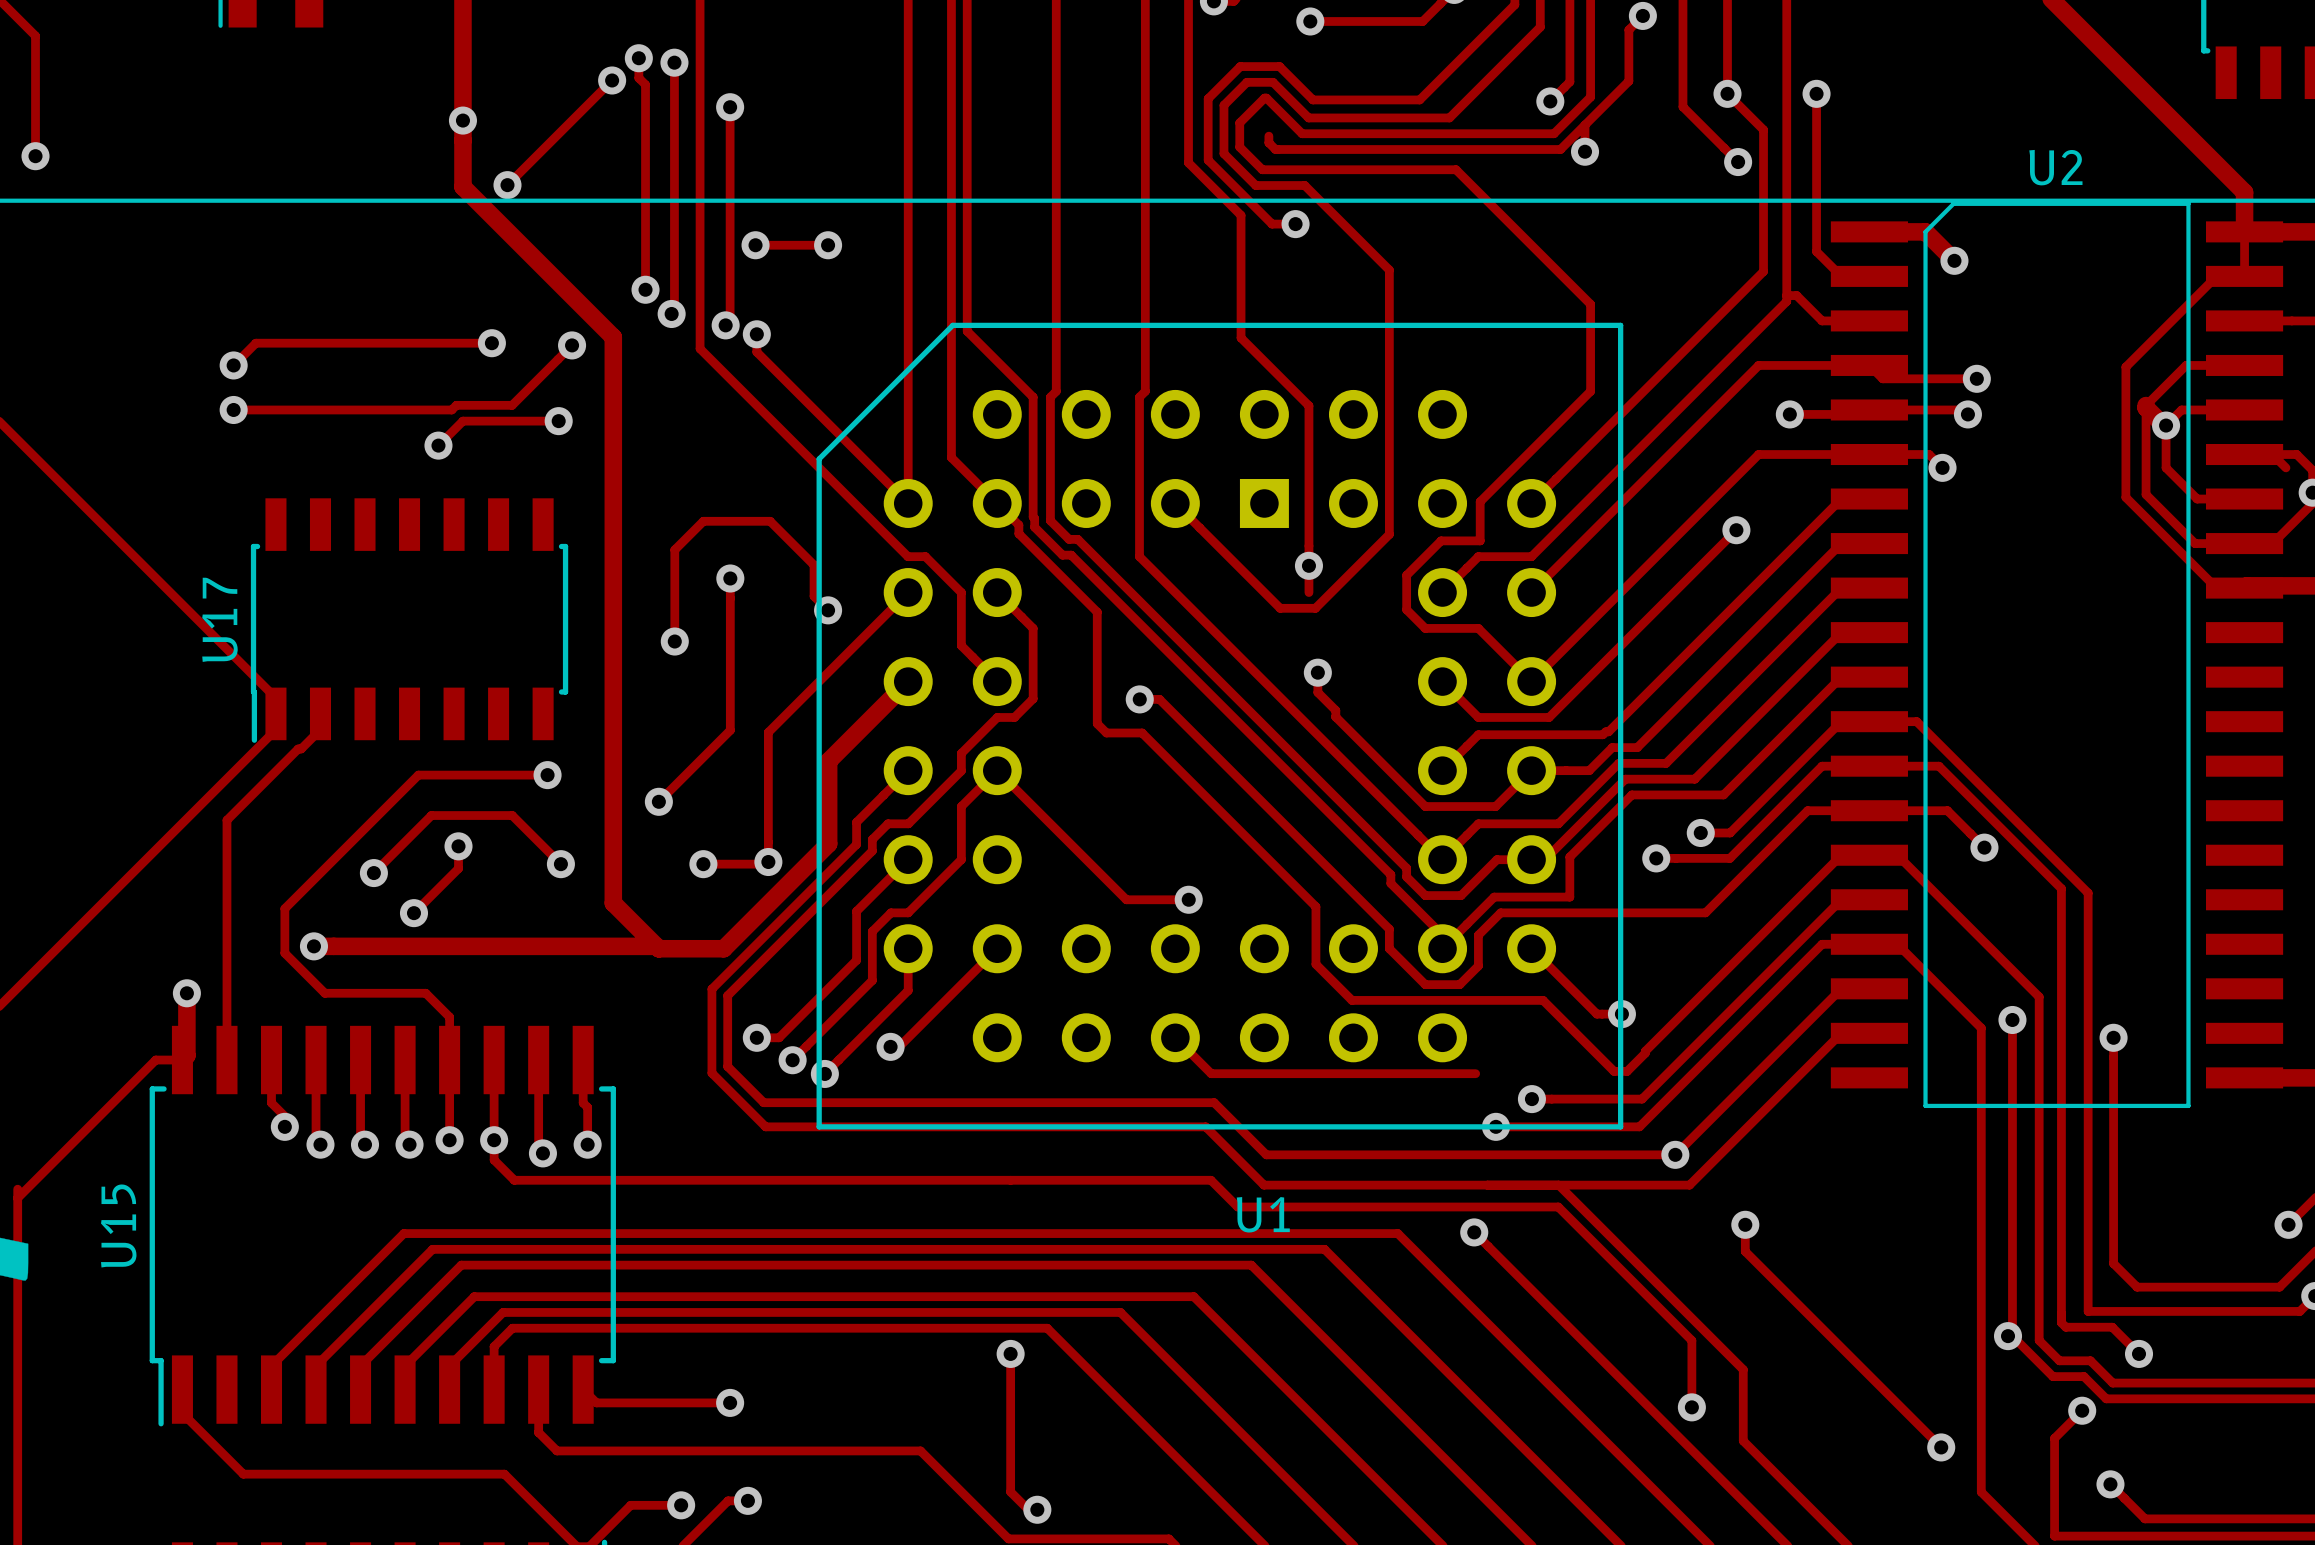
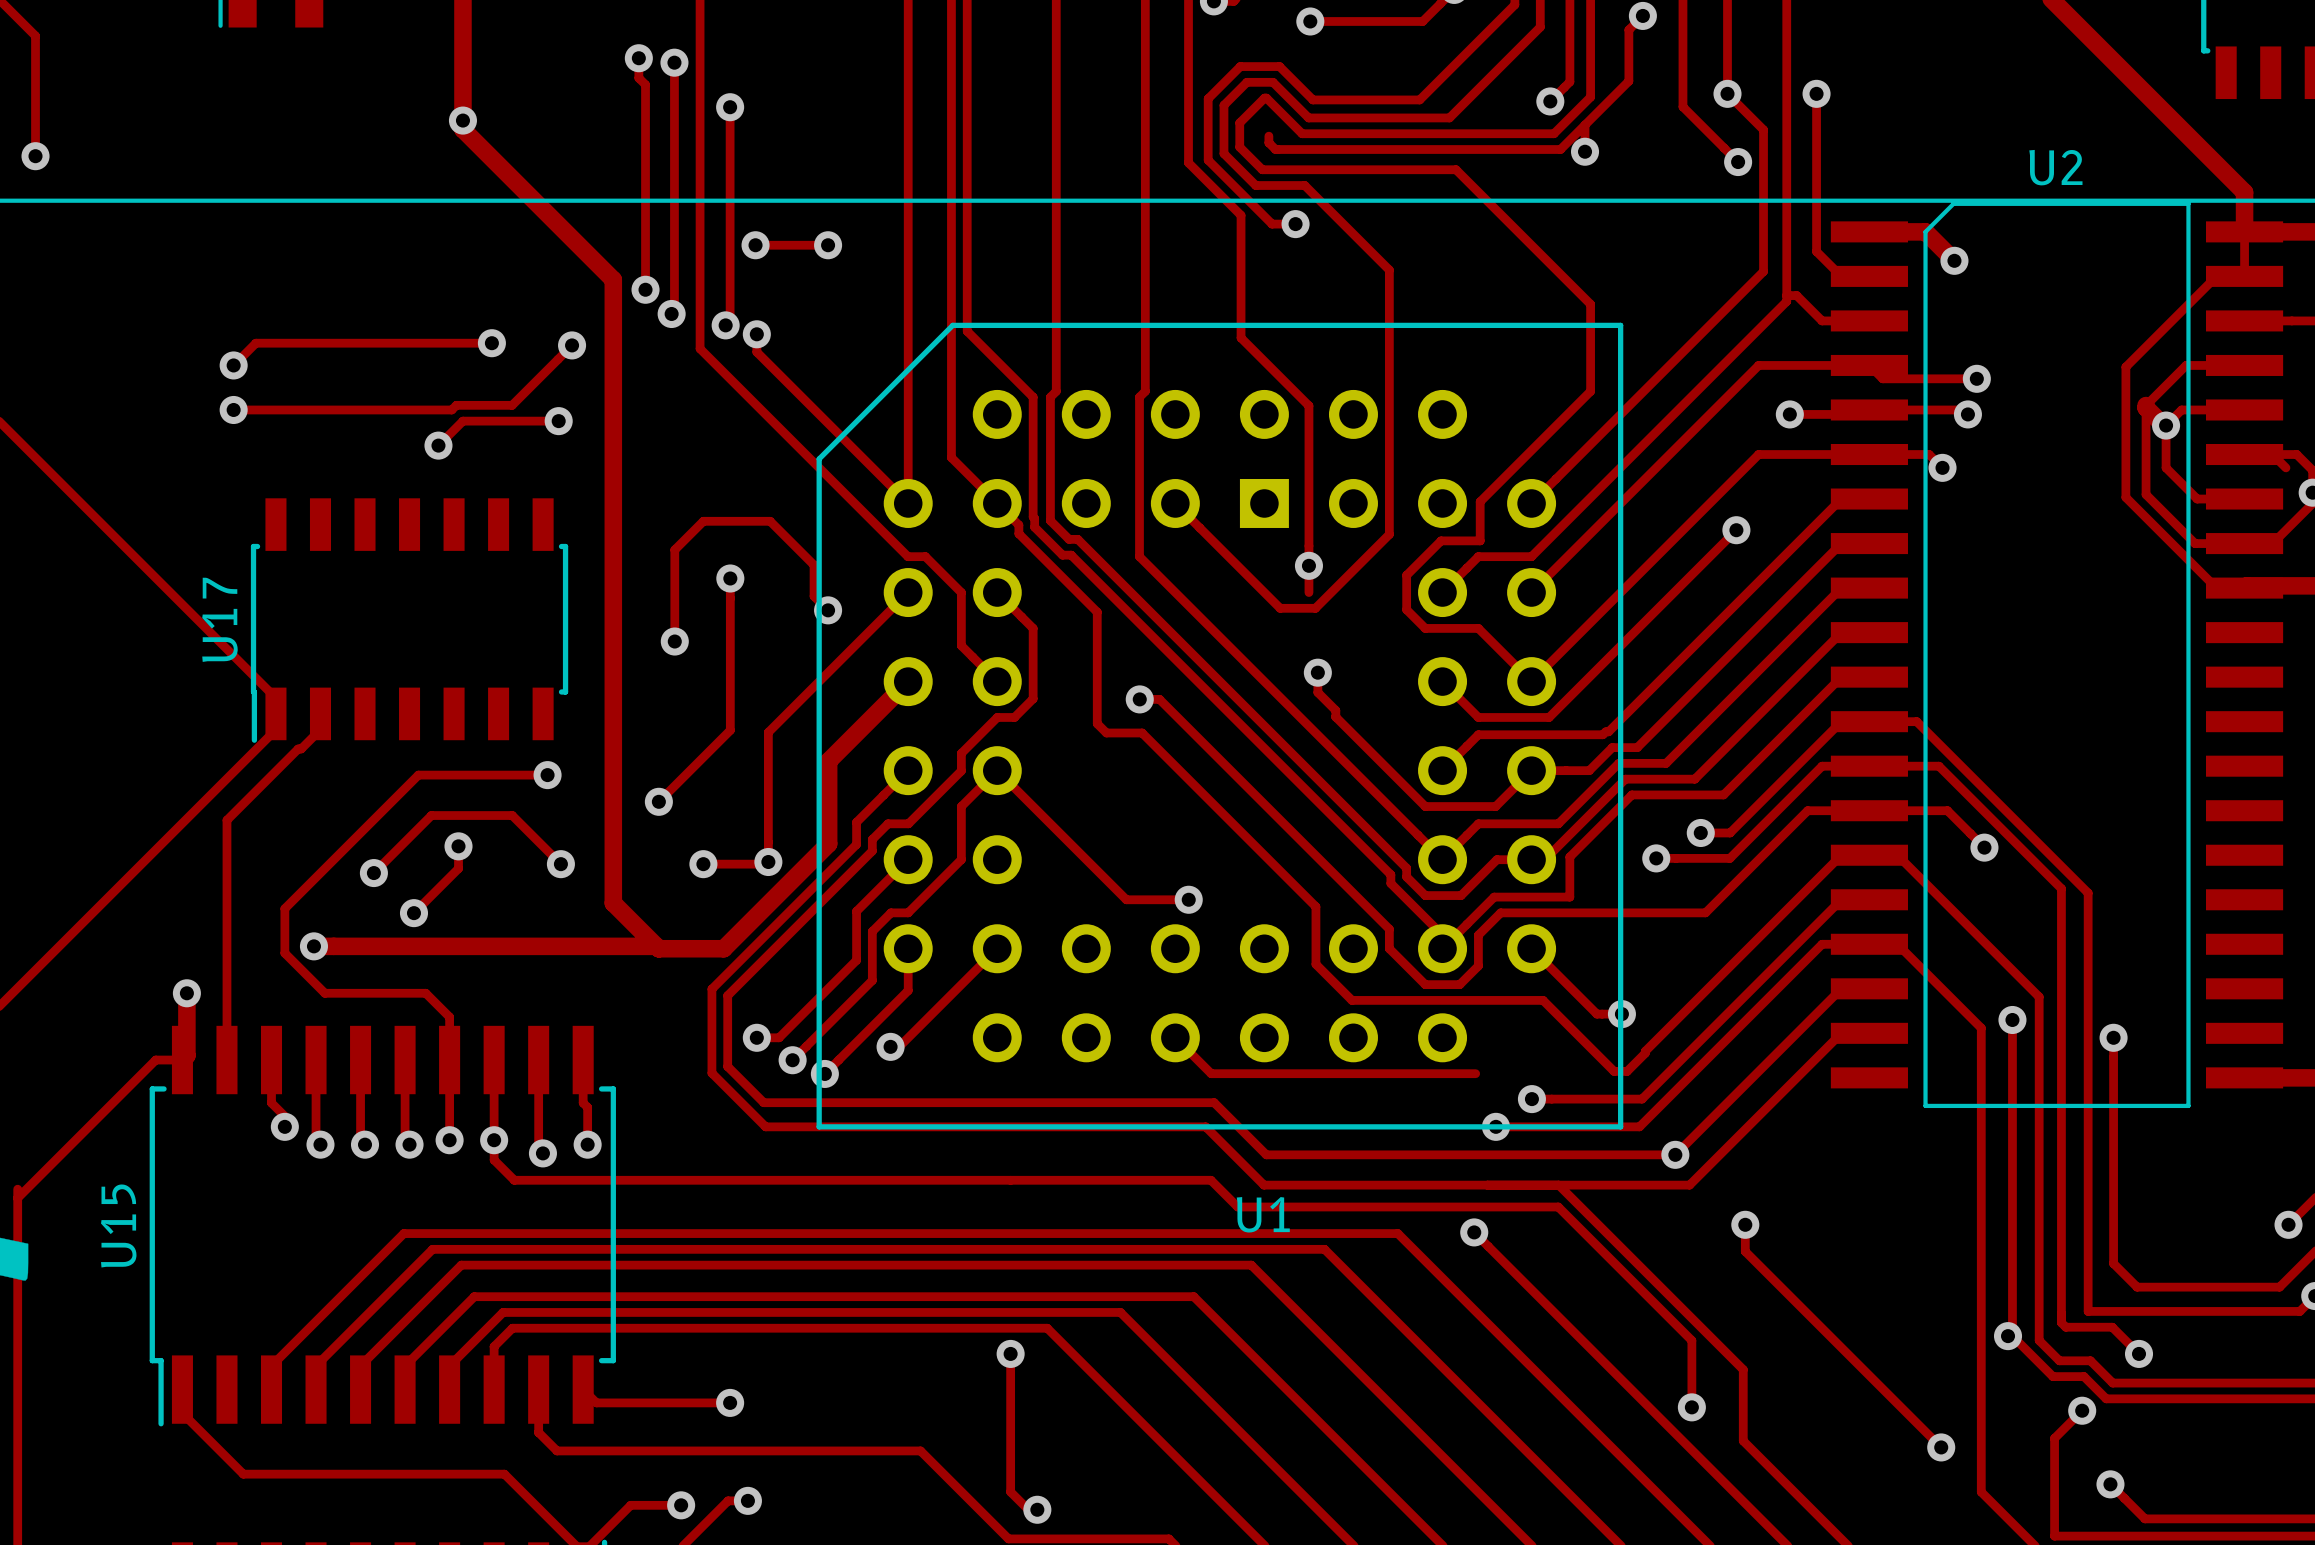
track: (612, 80) (507, 185) -> none
via: (612, 80) -> none
track: (462, 129) (462, 186) (613, 337) -> (462, 129) (613, 279) (613, 337)
via: (507, 185) -> none

